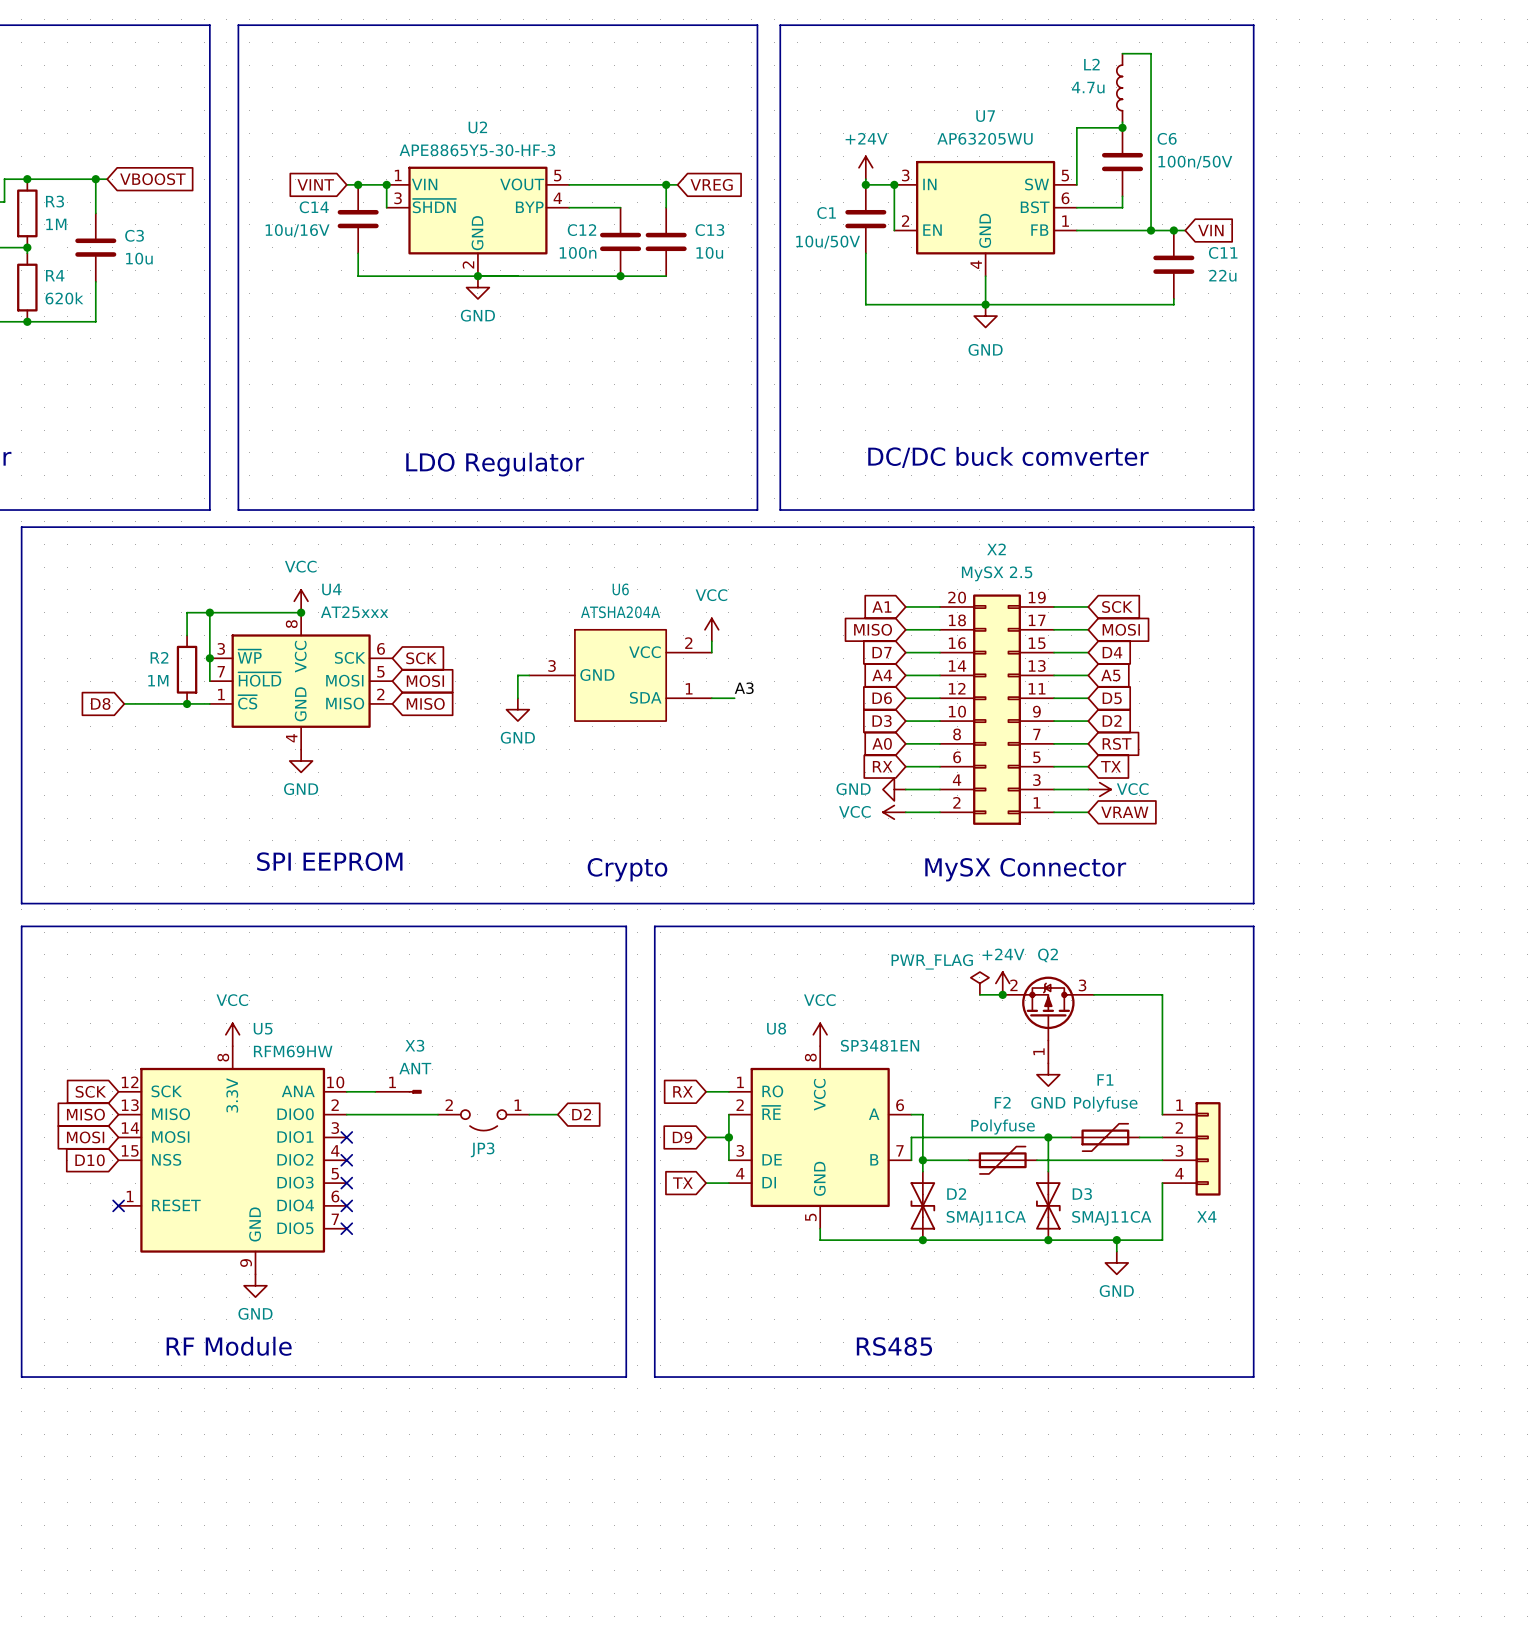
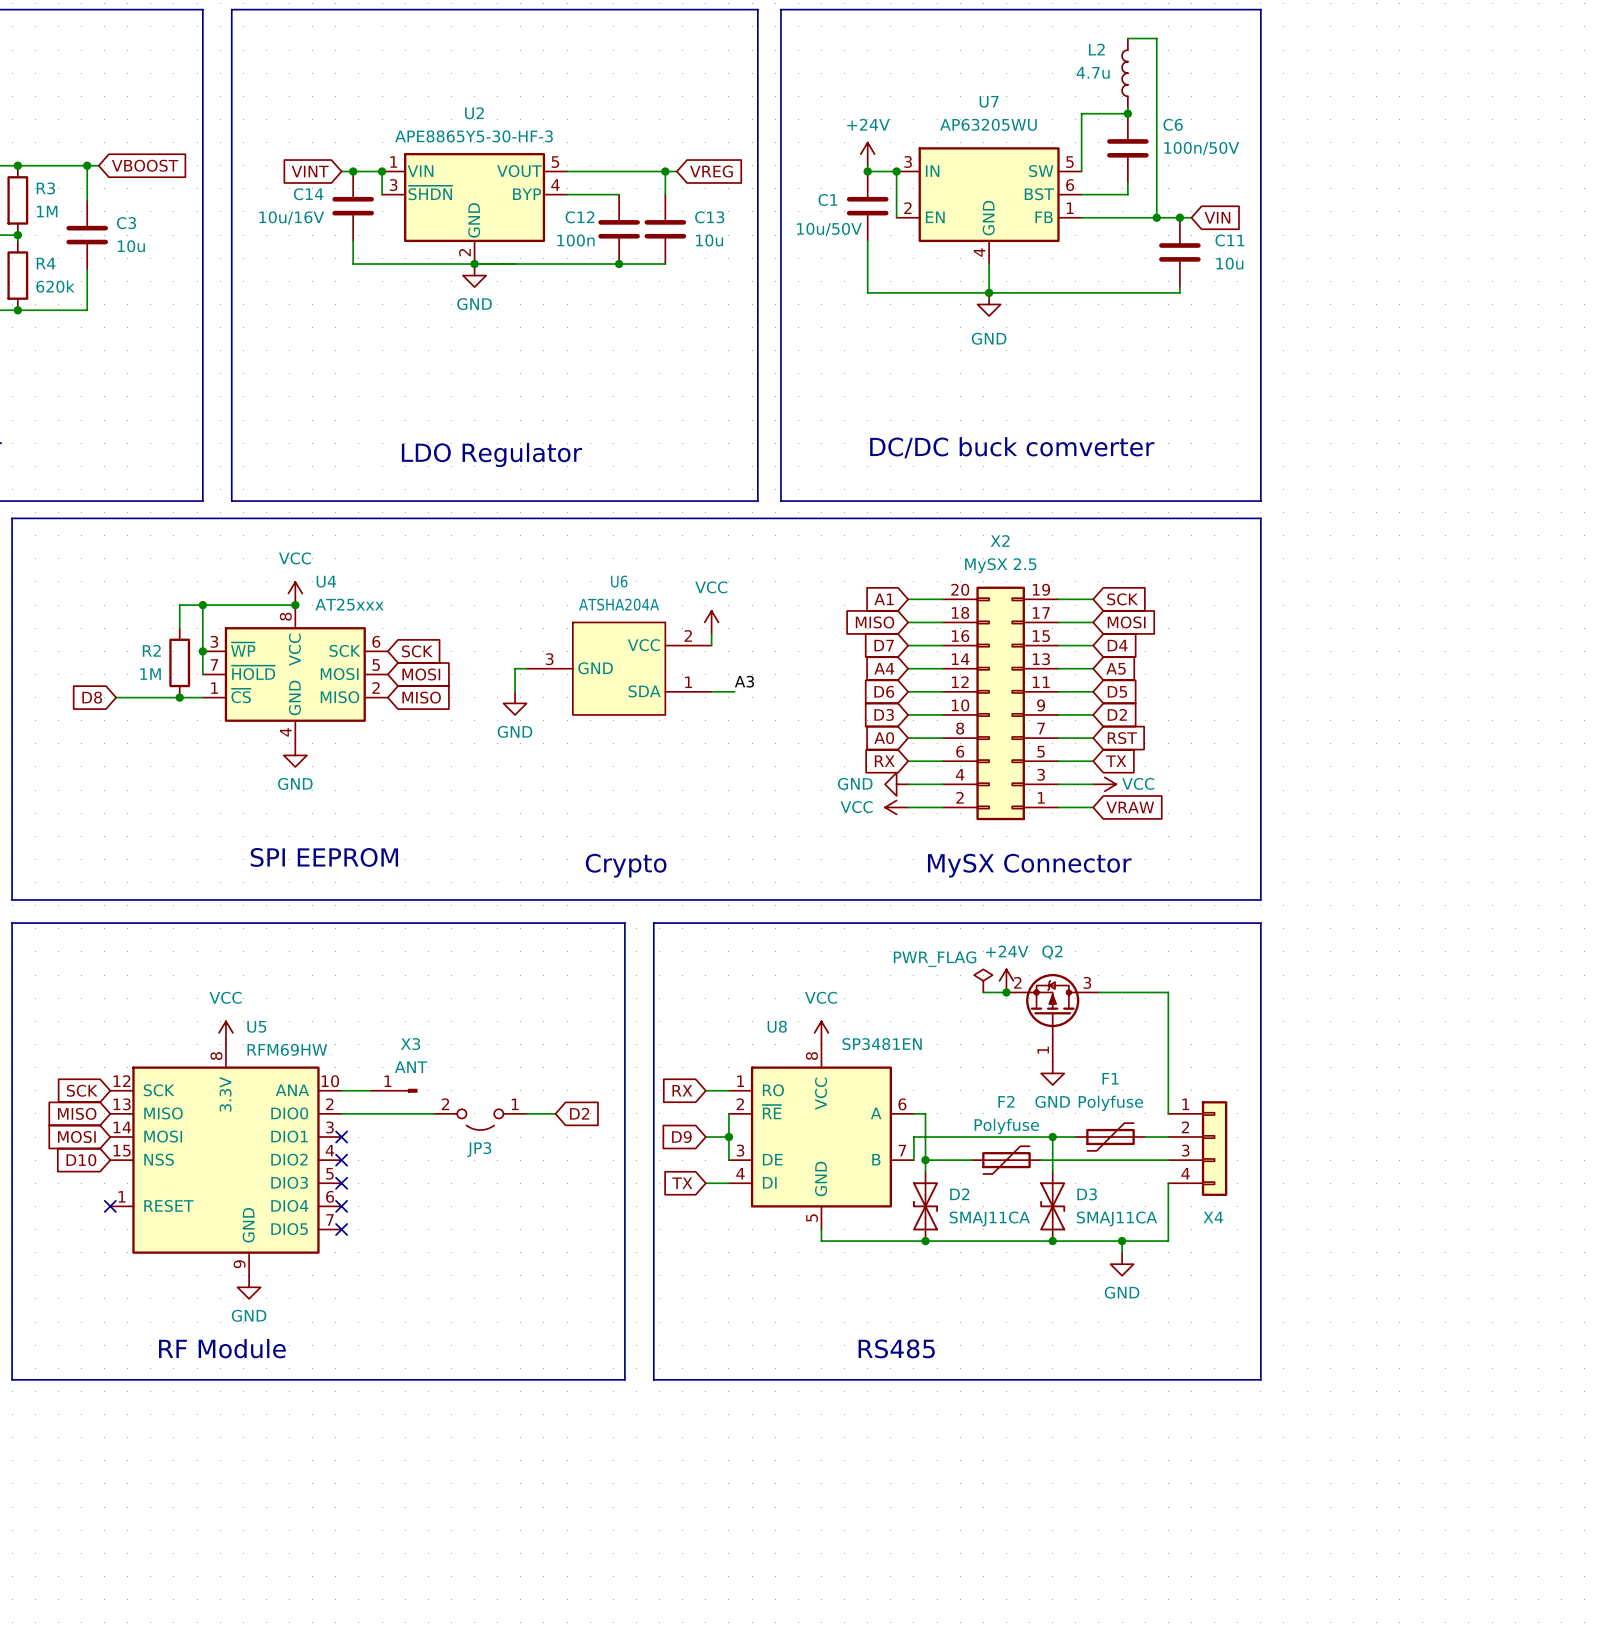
C11 value: 22u (1222, 275) -> 10u (1229, 263)

